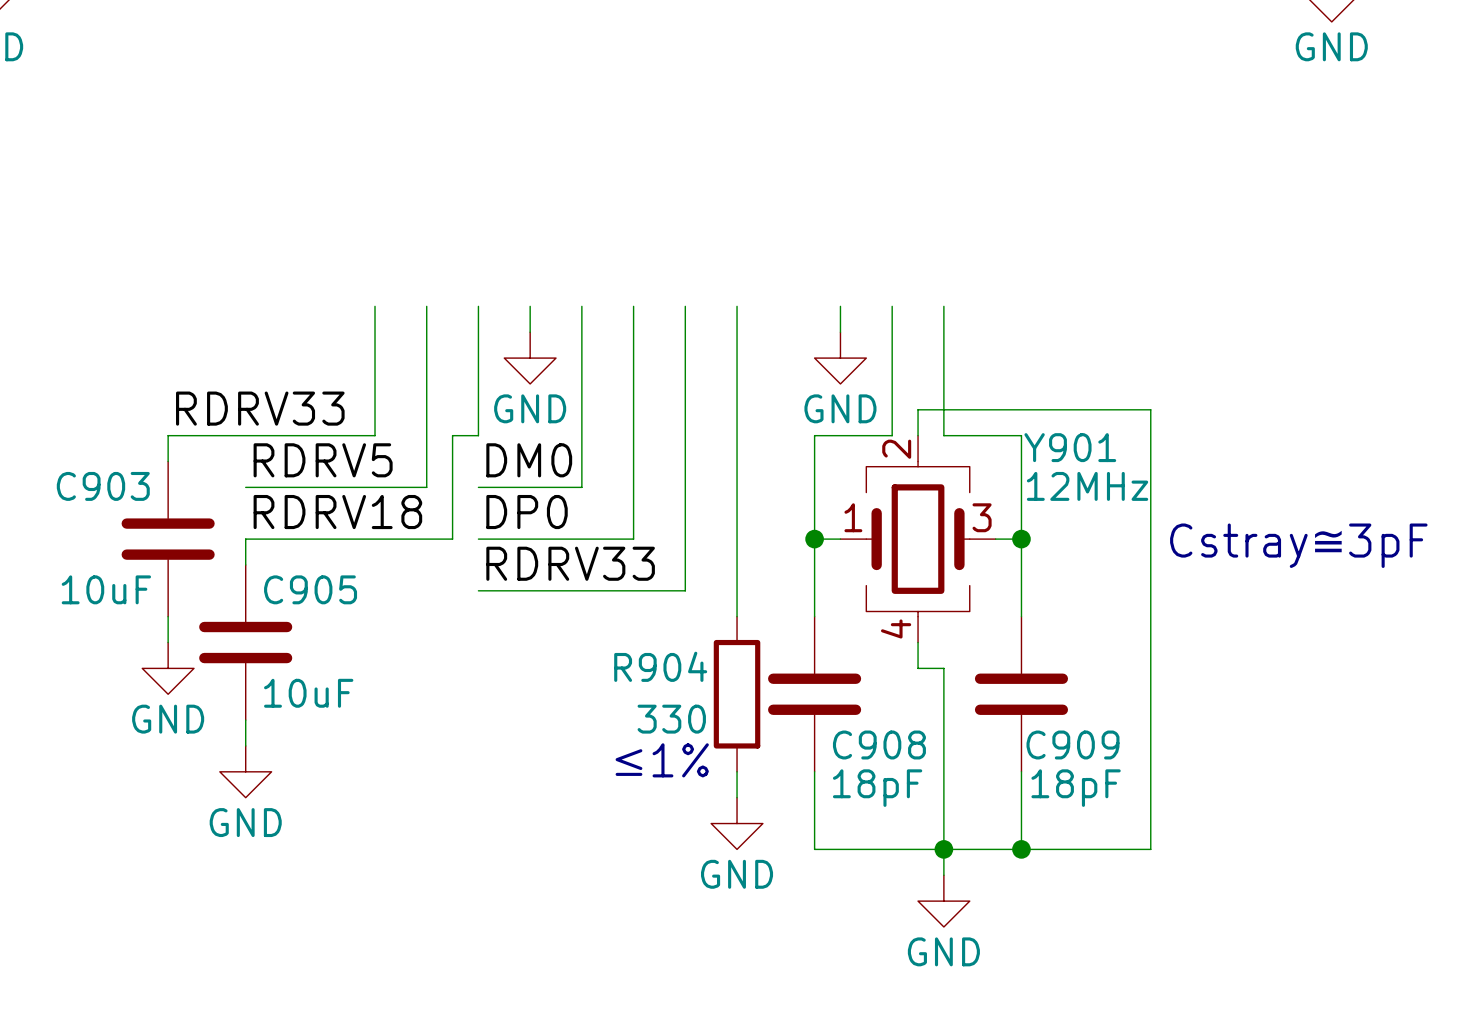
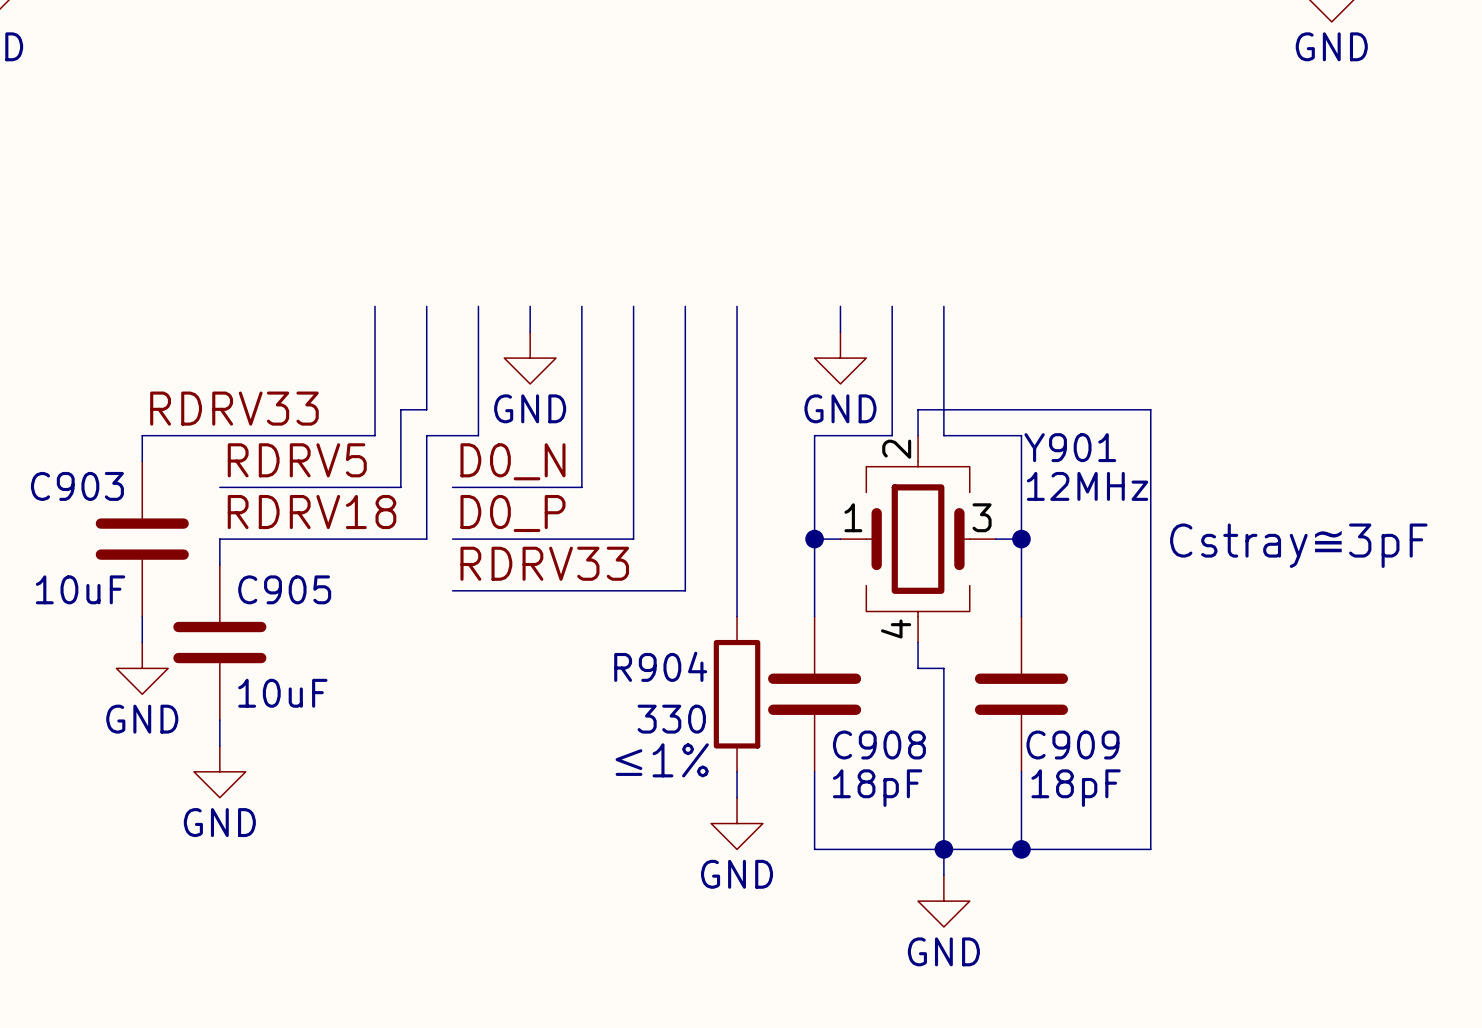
label position: RDRV33 (260, 408) -> RDRV33 (234, 408)
wire: (426, 409) (426, 435) -> (452, 435) (426, 435)
wire: none -> (426, 409) (400, 409) (400, 487)
wire: (168, 435) (168, 461) -> (168, 435) (142, 435) (142, 461)
wire: (452, 435) (452, 539) (426, 539) -> none
label position: RDRV5 (323, 460) -> RDRV5 (297, 460)
label: DM0 (529, 460) -> none
label: none -> D0_N (512, 461)
wire: none -> (219, 487) (245, 487)
wire: (400, 487) (426, 487) -> (426, 539) (426, 487)
wire: none -> (452, 487) (478, 487)
label position: RDRV18 (337, 512) -> RDRV18 (312, 512)
label: DP0 (527, 512) -> none
label: none -> D0_P (512, 513)
C903 position: (168, 539) -> (142, 539)
wire: (245, 539) (245, 564) -> (245, 539) (219, 539) (219, 564)
wire: none -> (452, 539) (478, 539)
label position: RDRV33 (570, 563) -> RDRV33 (544, 563)
wire: none -> (452, 590) (478, 590)
wire: (168, 616) (168, 642) -> (142, 616) (142, 642)
C905 position: (245, 642) -> (219, 642)
power symbol position: GND (168, 668) -> GND (142, 668)
wire: (245, 720) (245, 745) -> (219, 720) (219, 745)
power symbol position: GND (245, 771) -> GND (219, 771)

